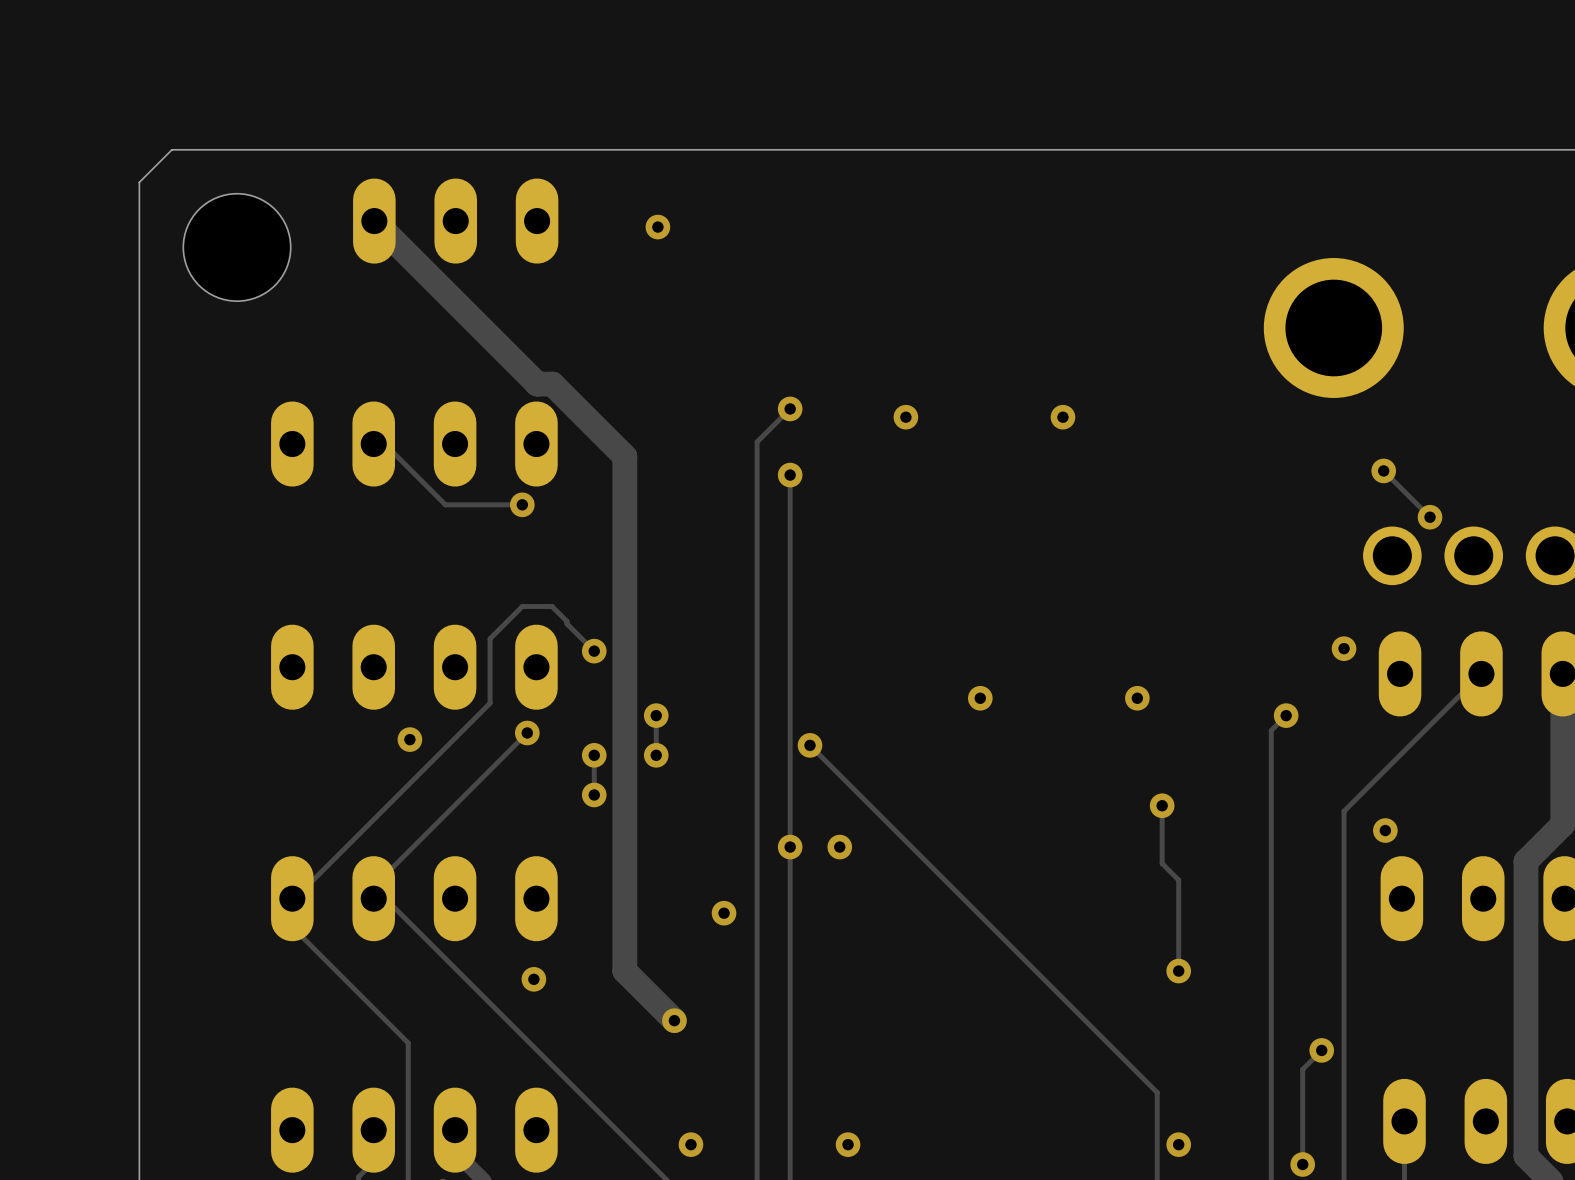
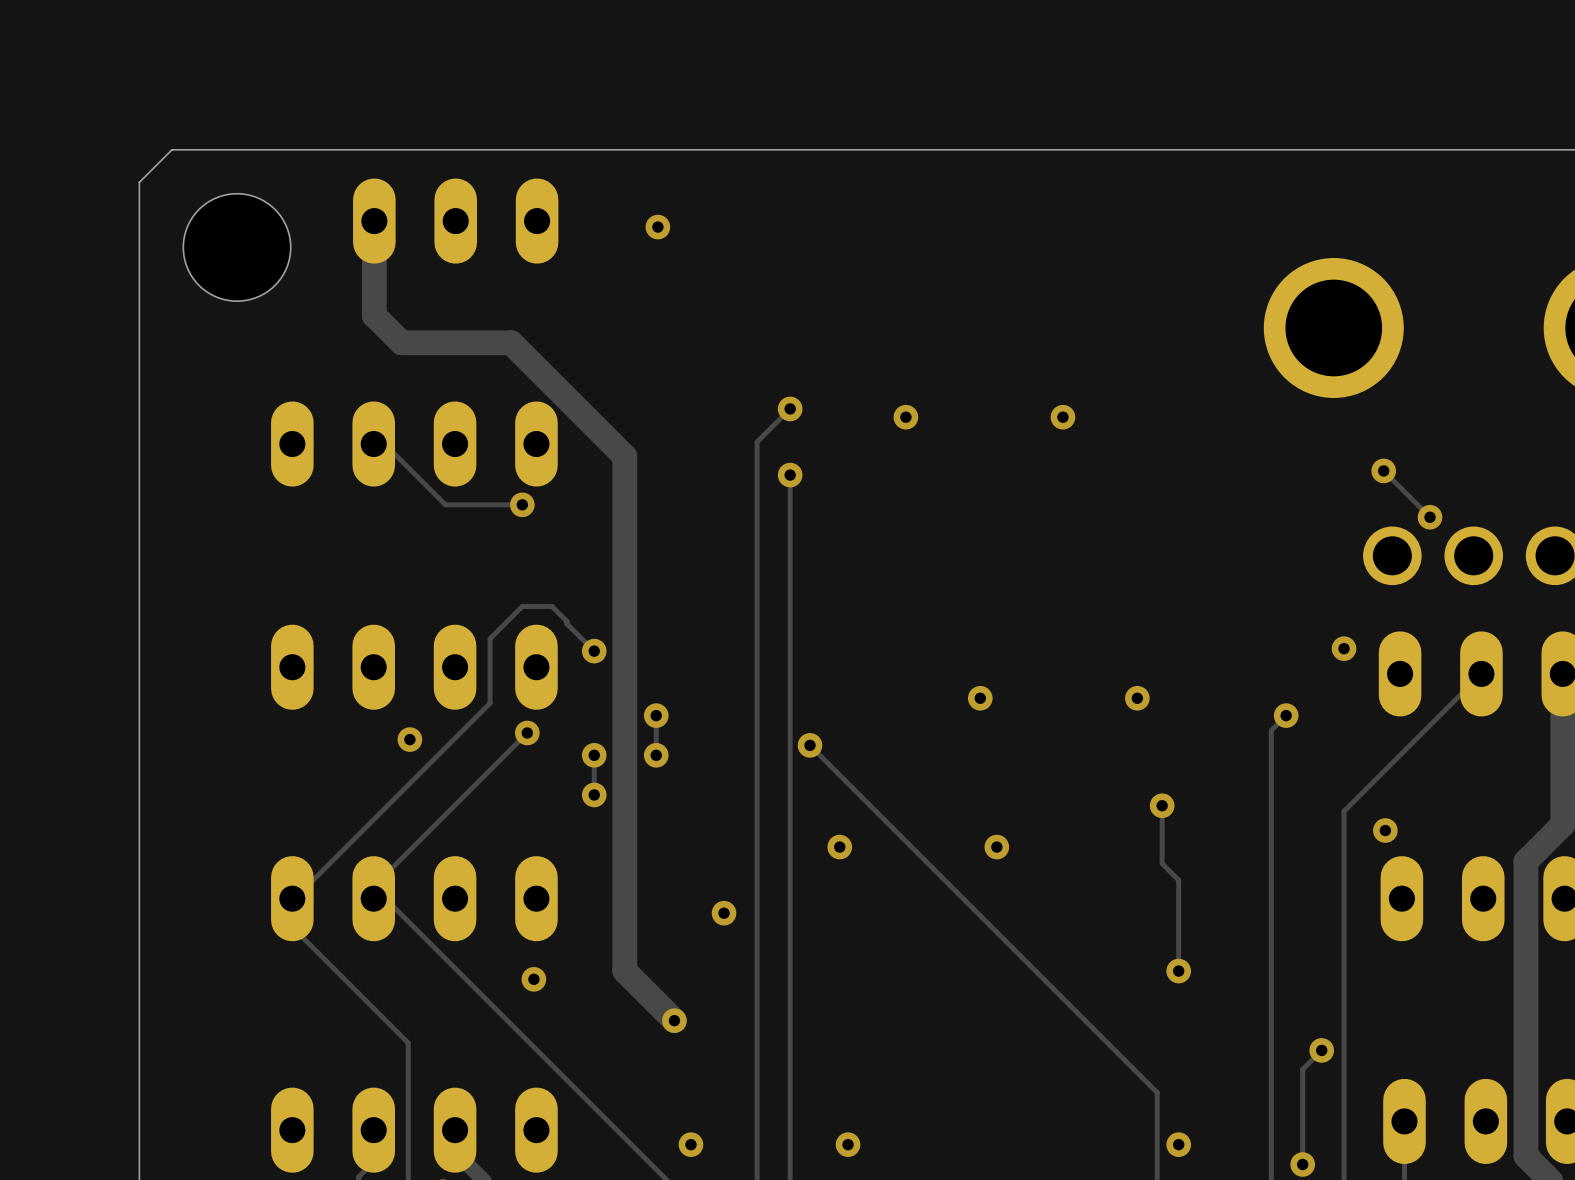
track: (374, 221) (537, 384) (552, 384) -> (374, 221) (374, 315) (401, 342) (511, 342) (552, 384)
via: (790, 847) -> none
via: none -> (996, 847)

